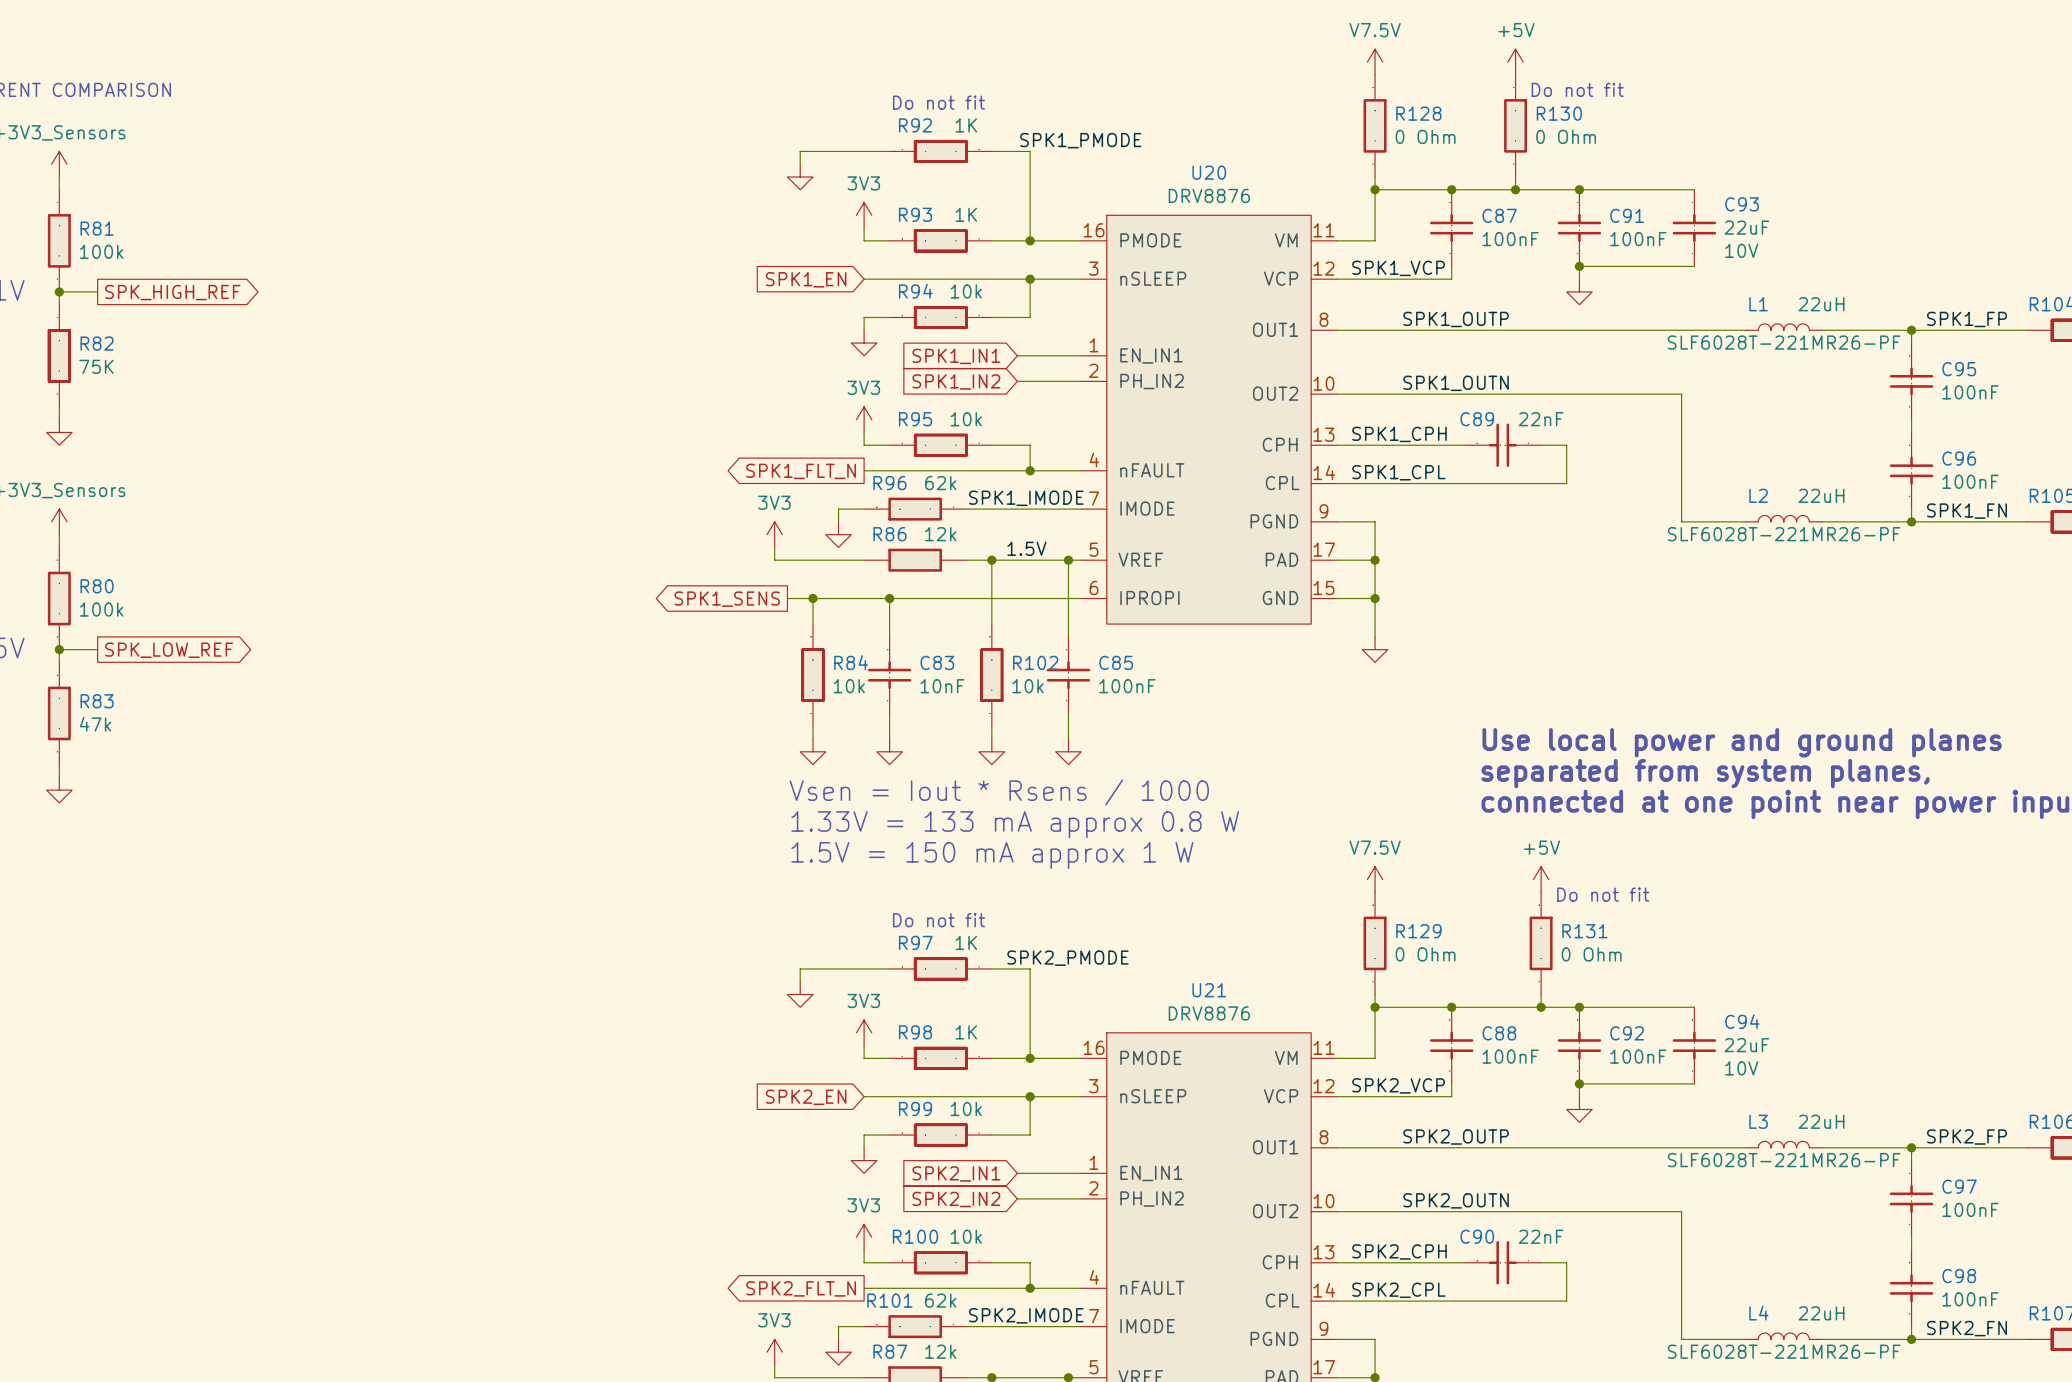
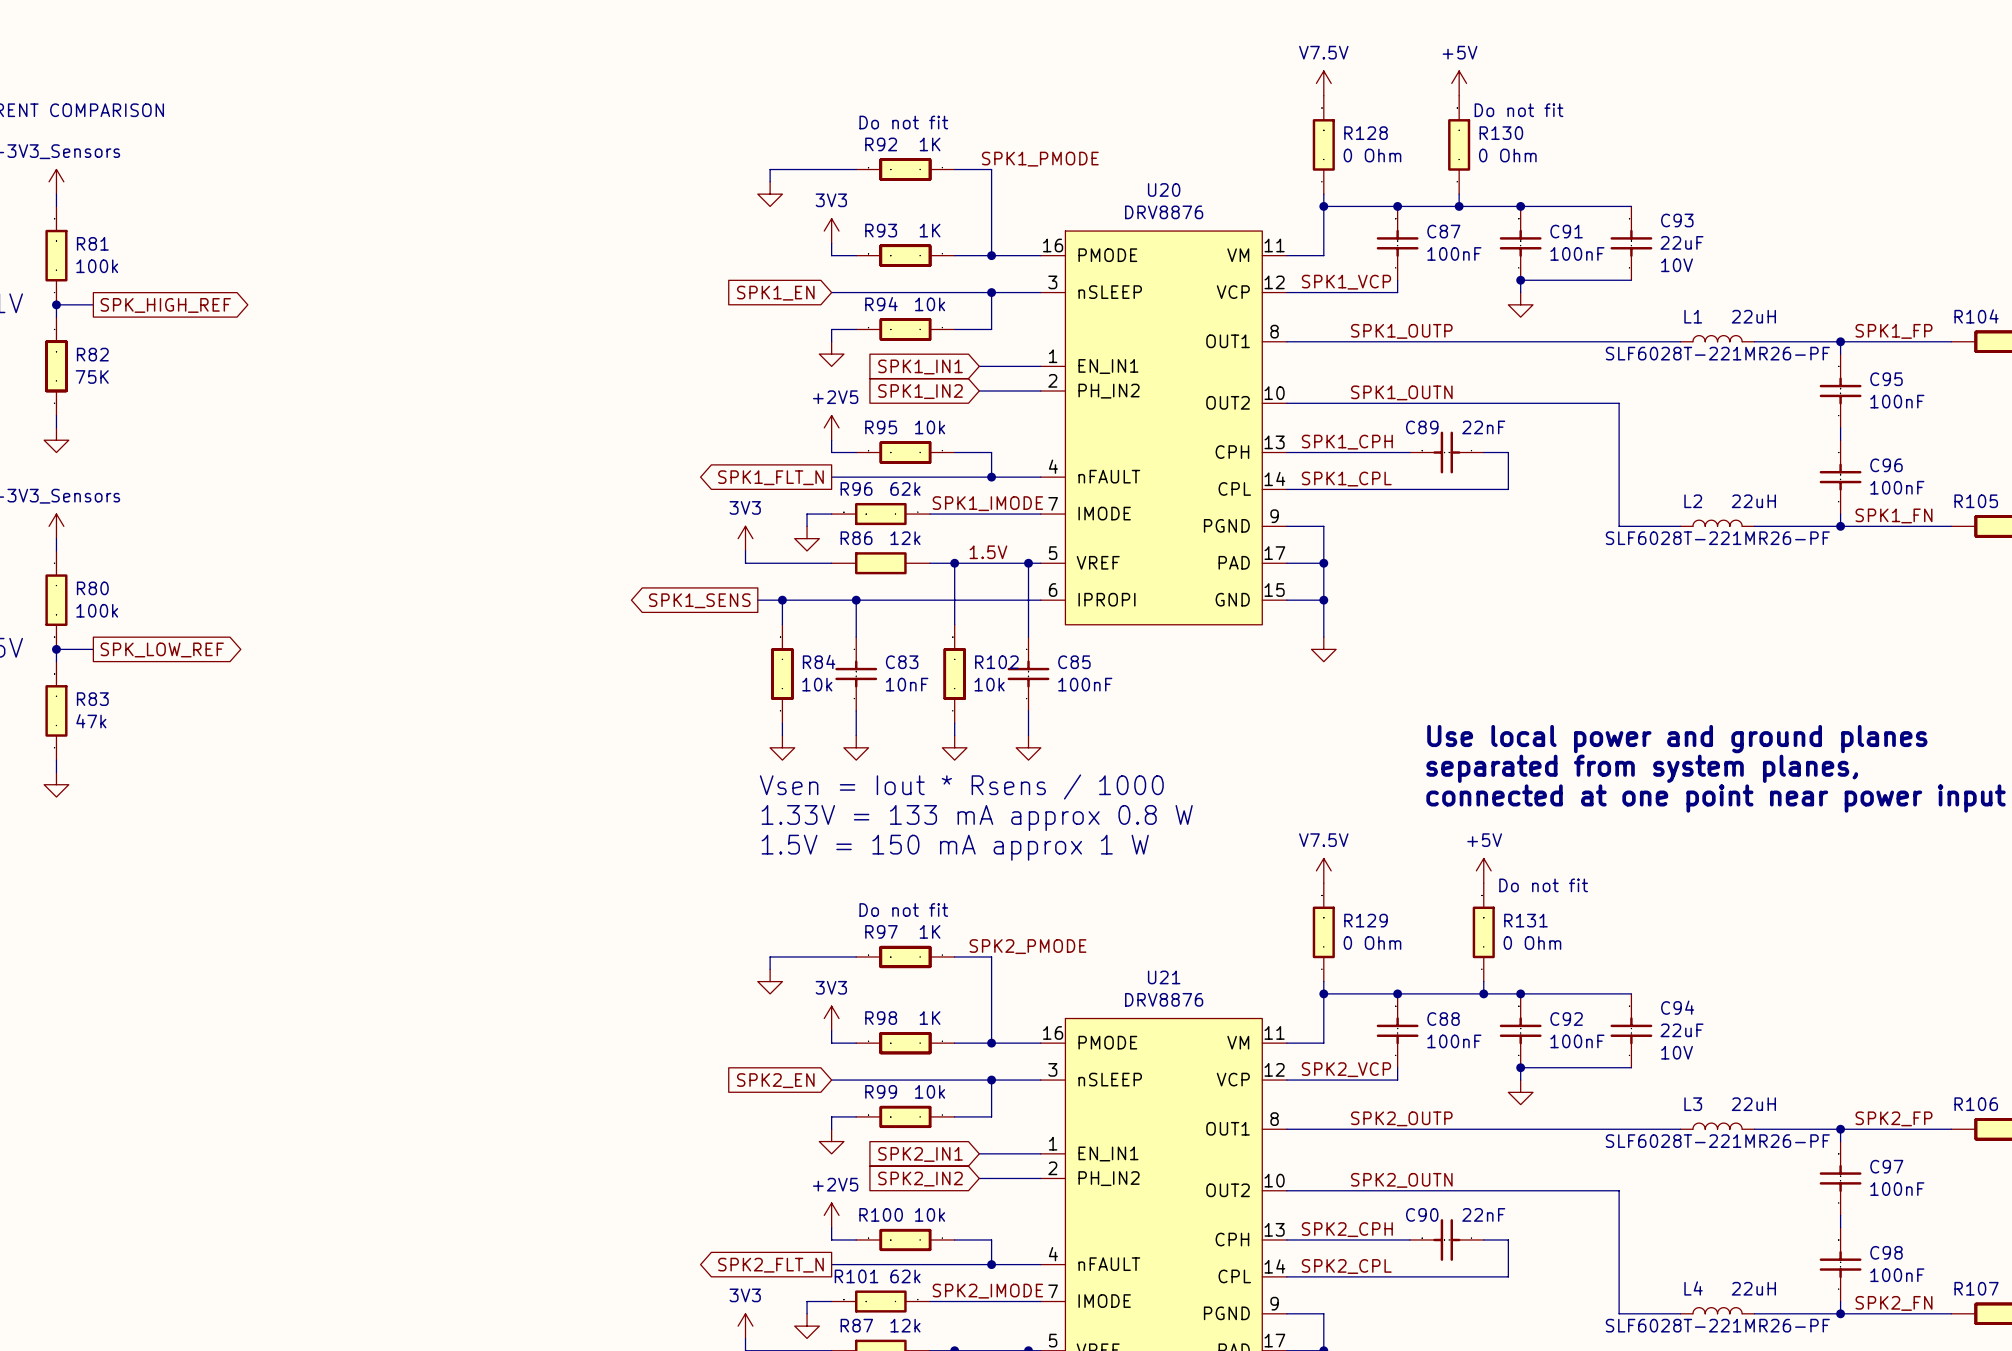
power symbol: 3V3 (864, 419) -> +2V5 (831, 427)
power symbol: 3V3 (864, 1237) -> +2V5 (831, 1215)

